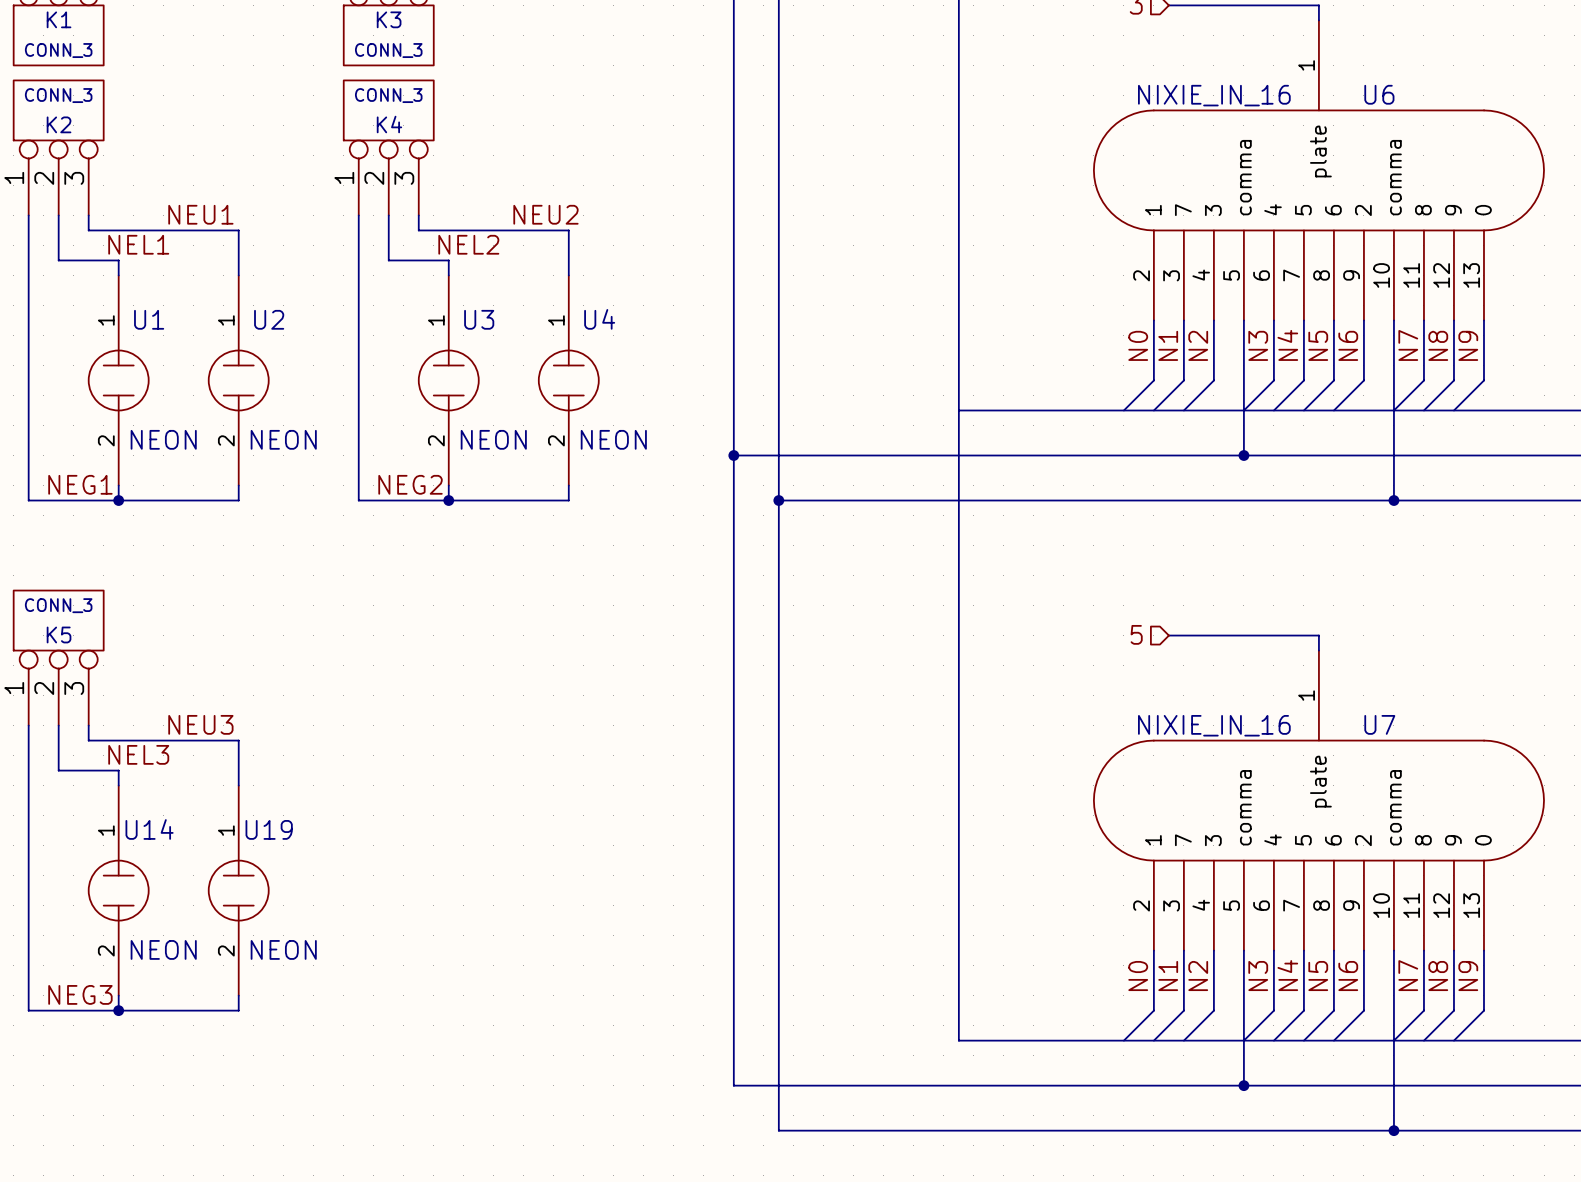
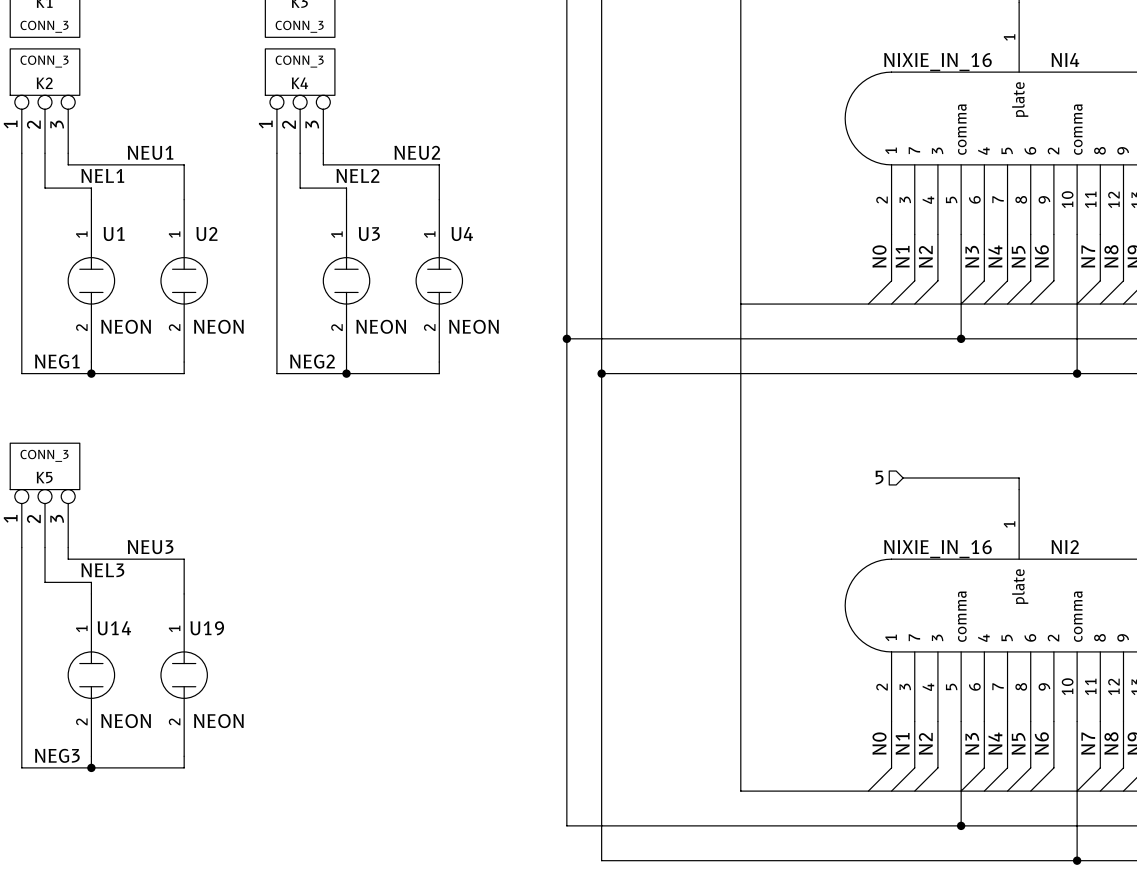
U6 name: U6 (1379, 94) -> NI4 (1065, 59)
U7 name: U7 (1379, 724) -> NI2 (1065, 547)

